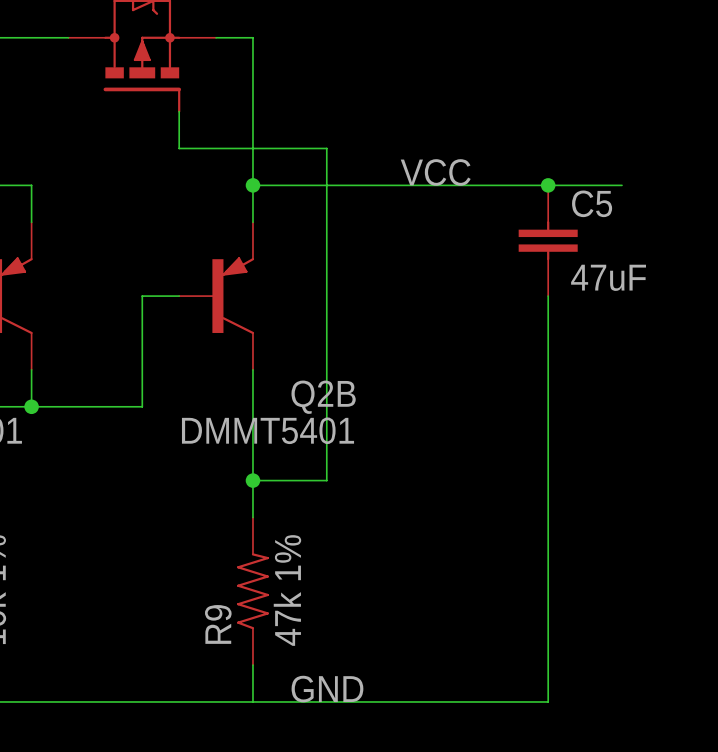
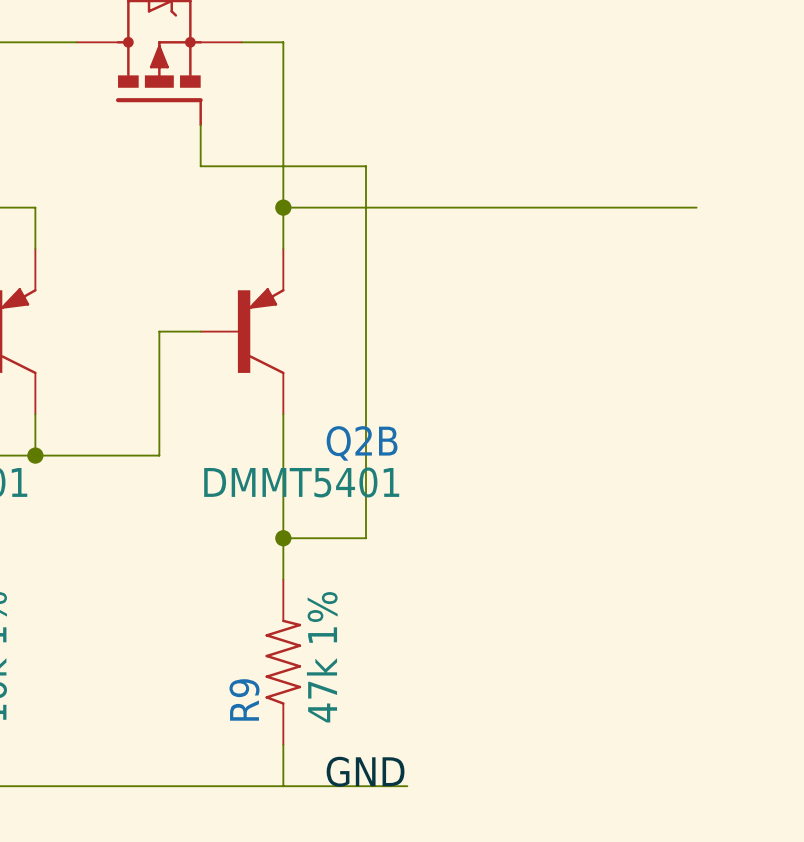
label: VCC (435, 172) -> none
junction: (548, 185) -> none
C5: 47uF (548, 240) -> none
wire: (548, 296) (548, 701) (363, 701) -> none

